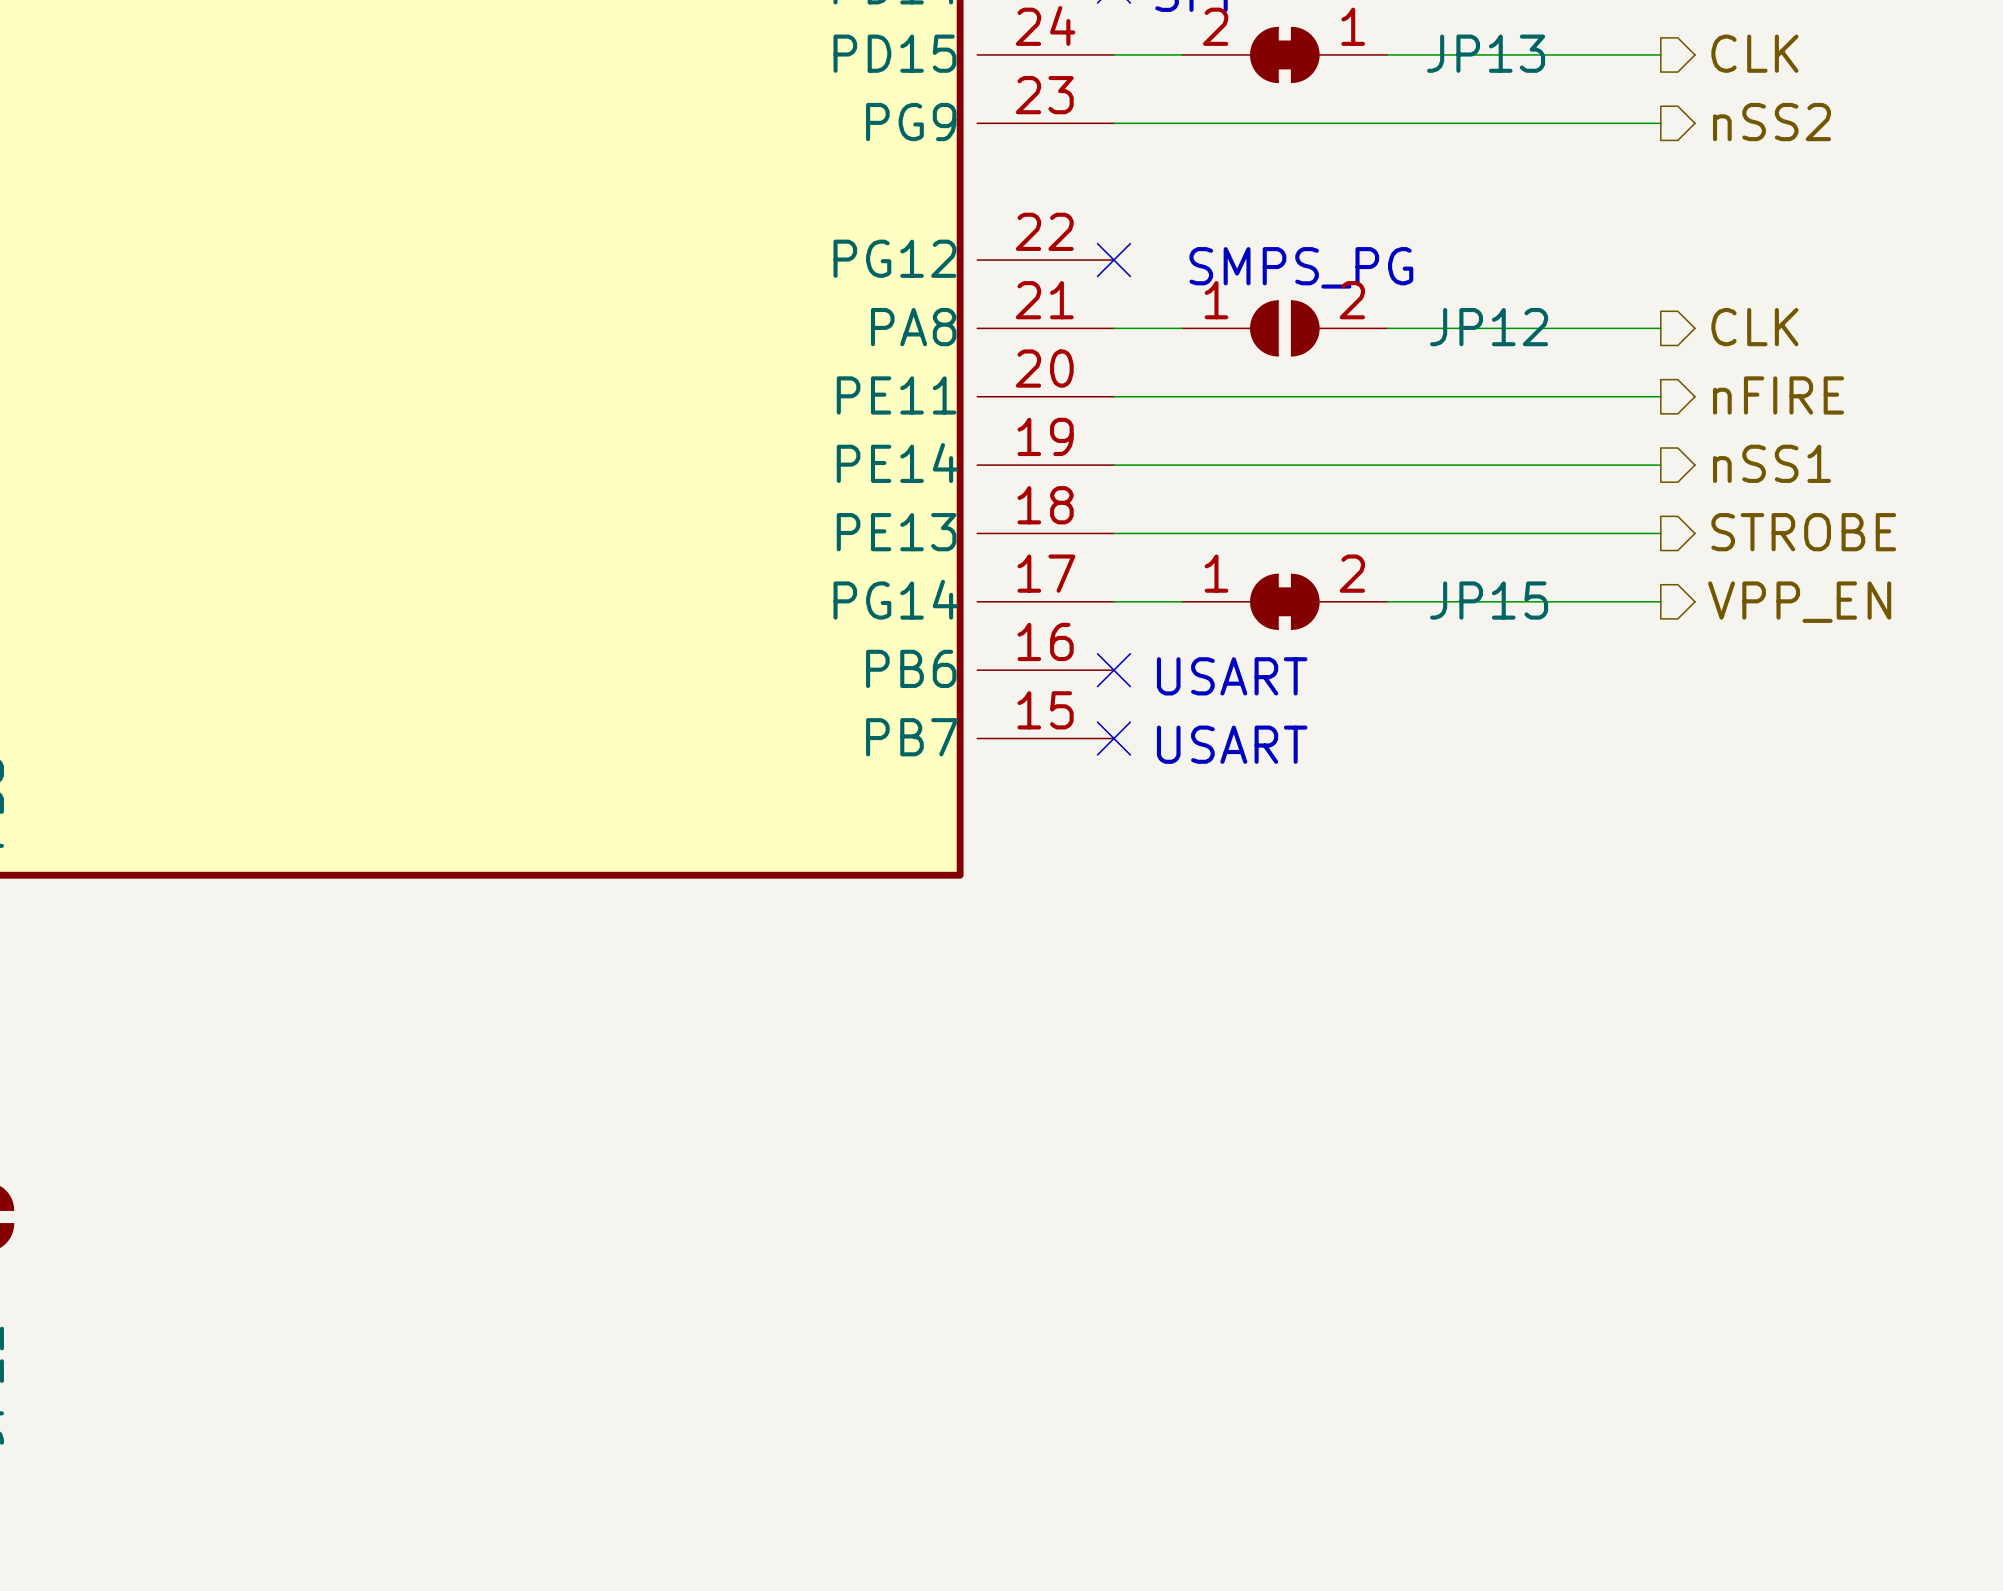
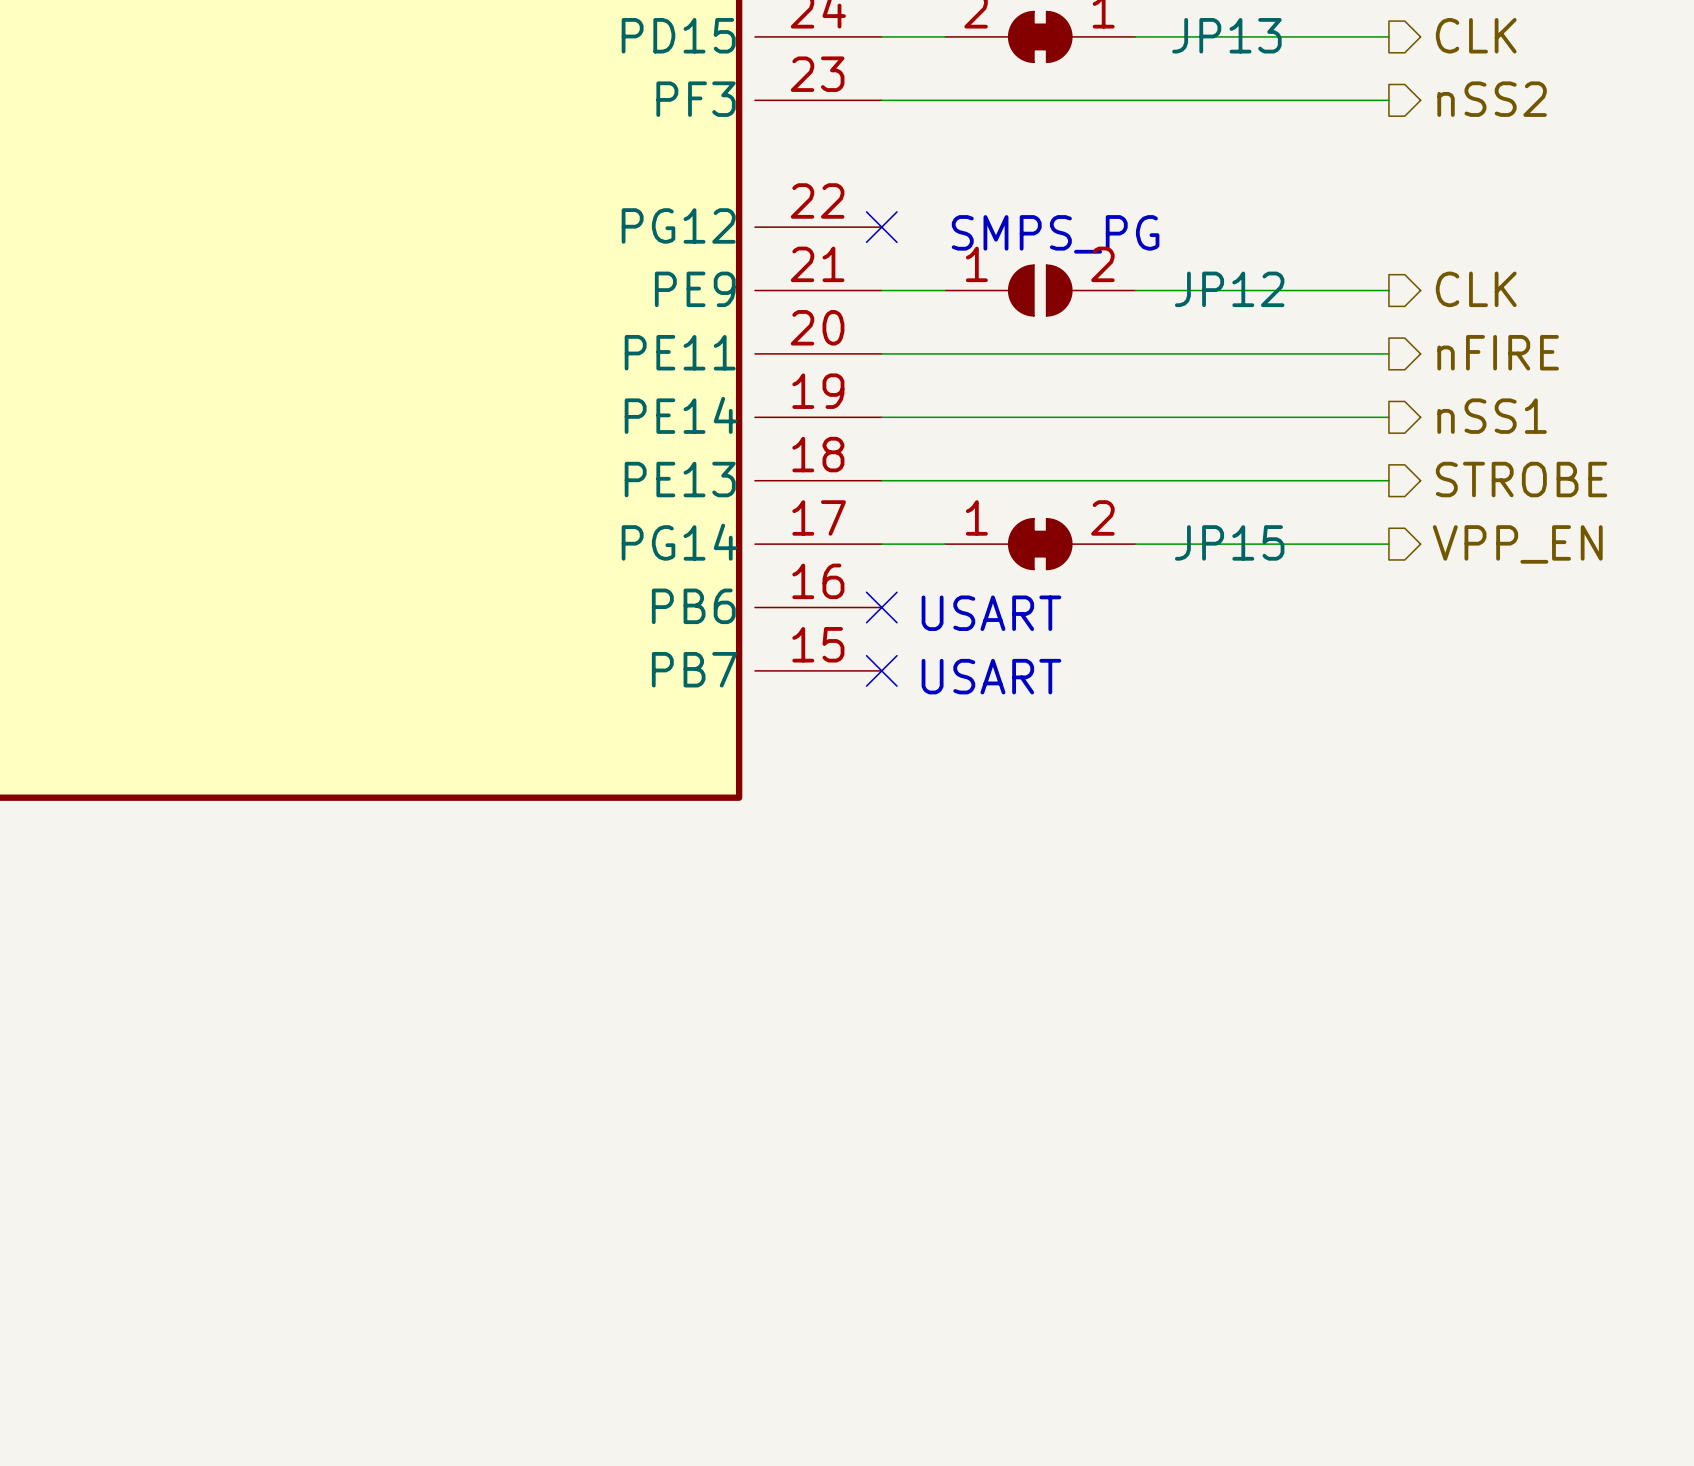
part pin name: PG9 (911, 122) -> PF3 (696, 99)
part pin name: PA8 (913, 327) -> PE9 (695, 289)

